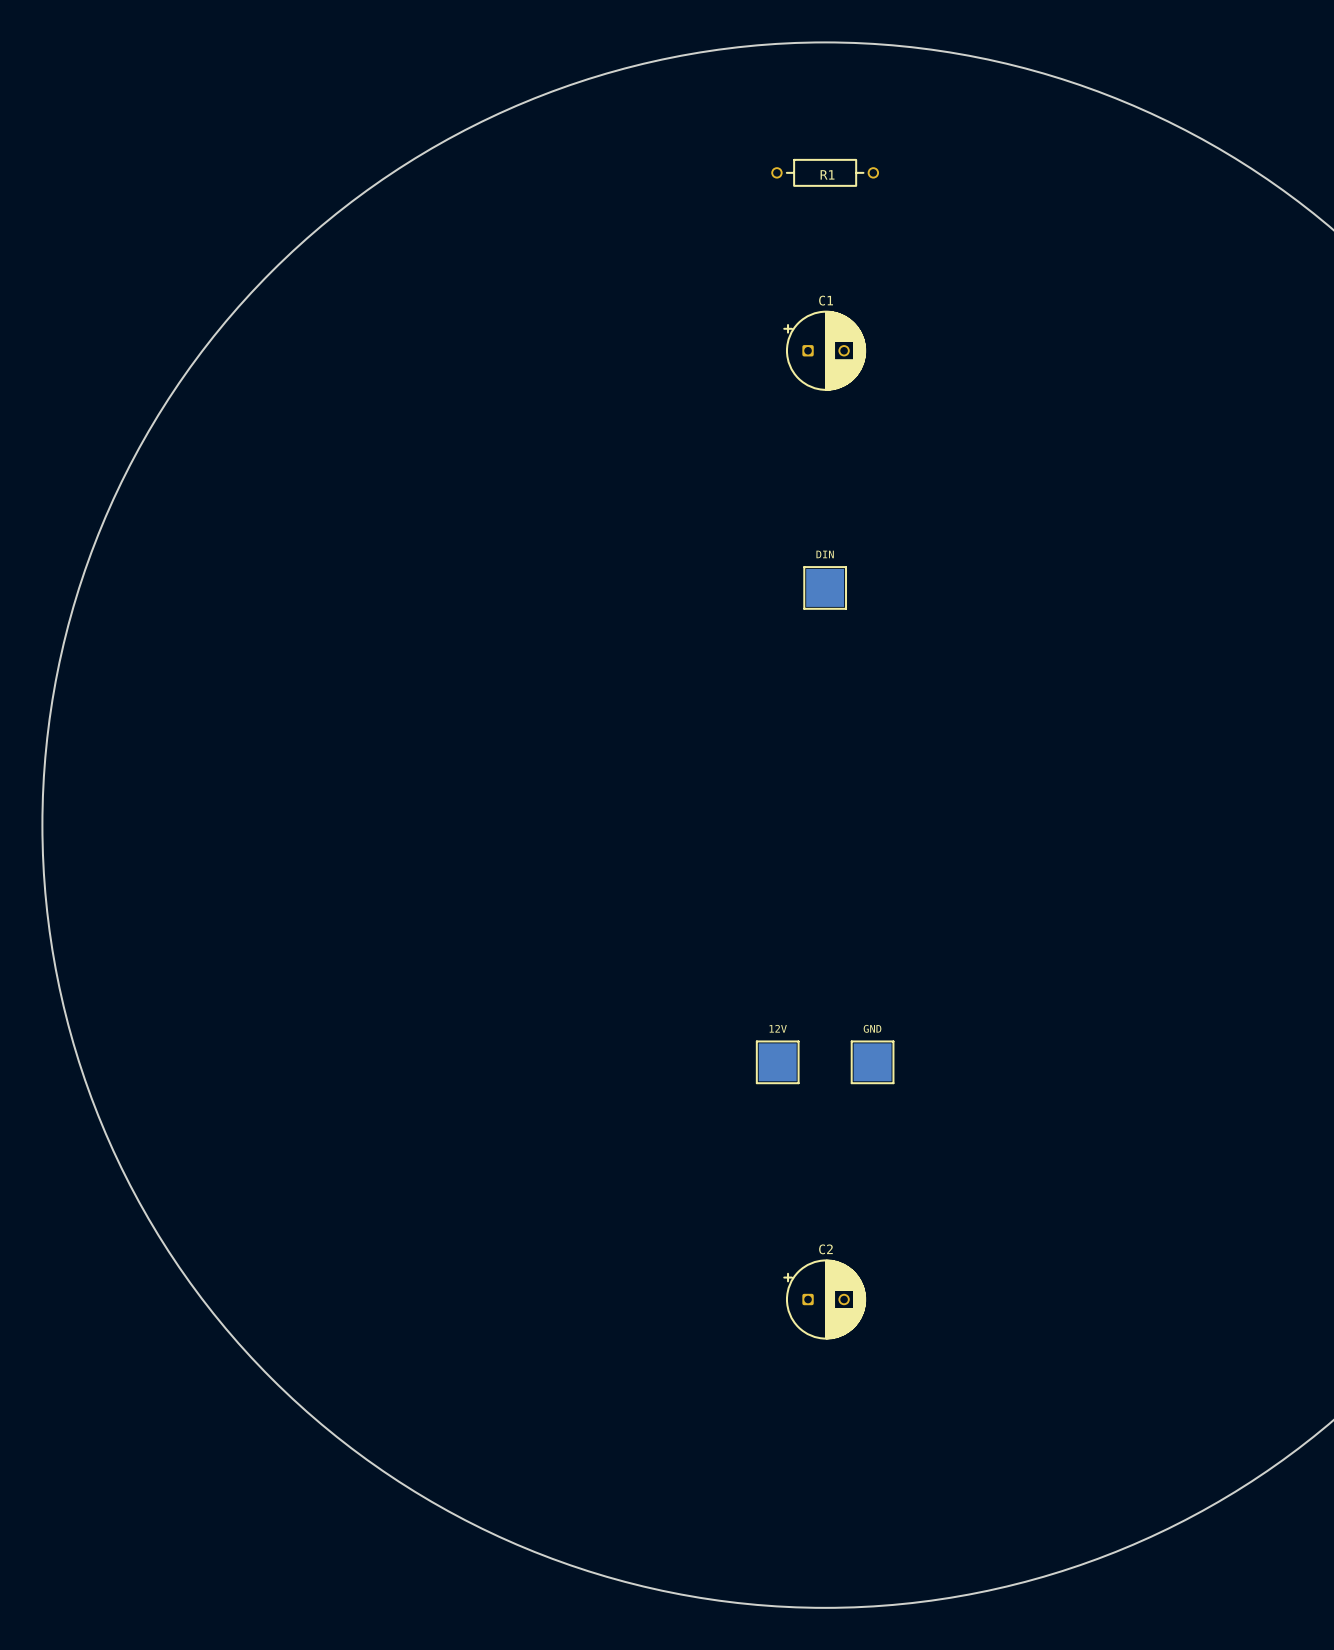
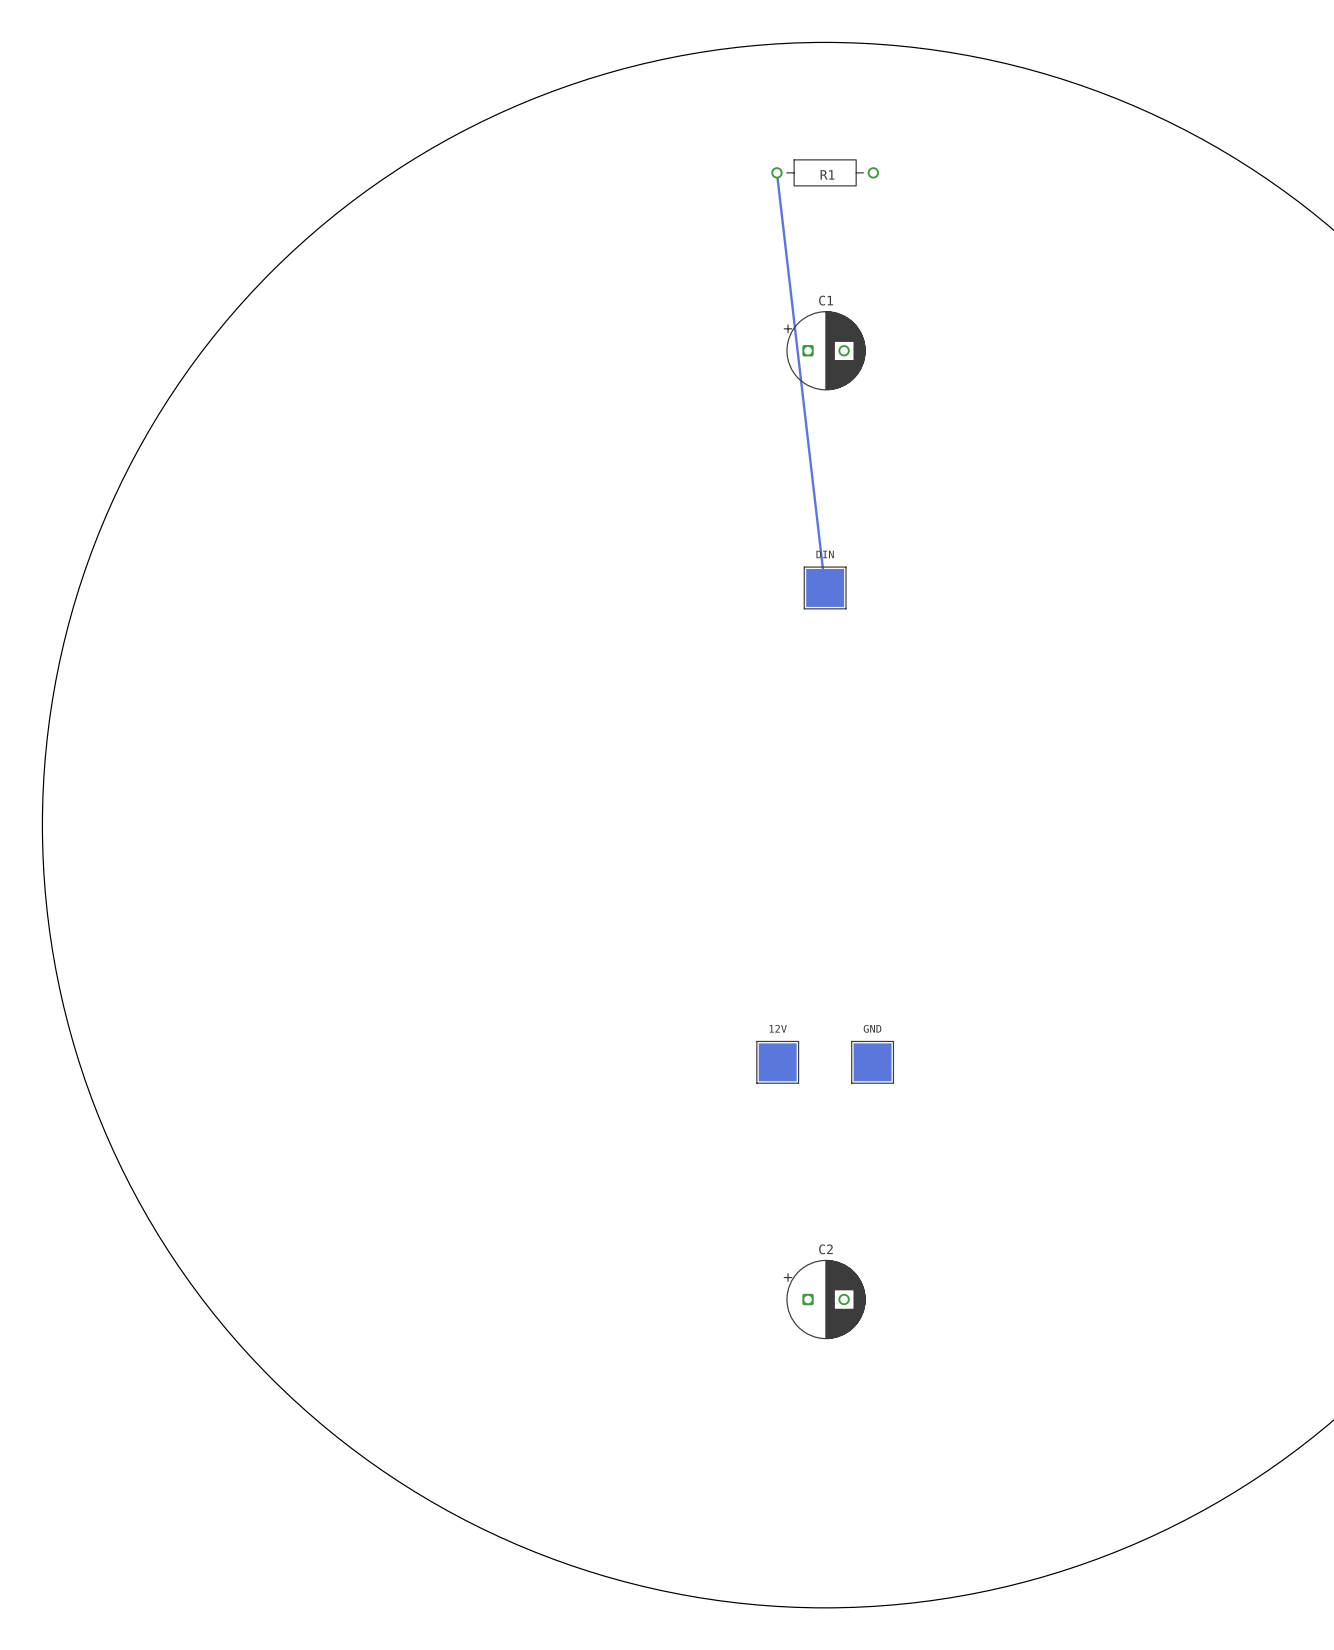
track: none -> (776, 172) (825, 587)

